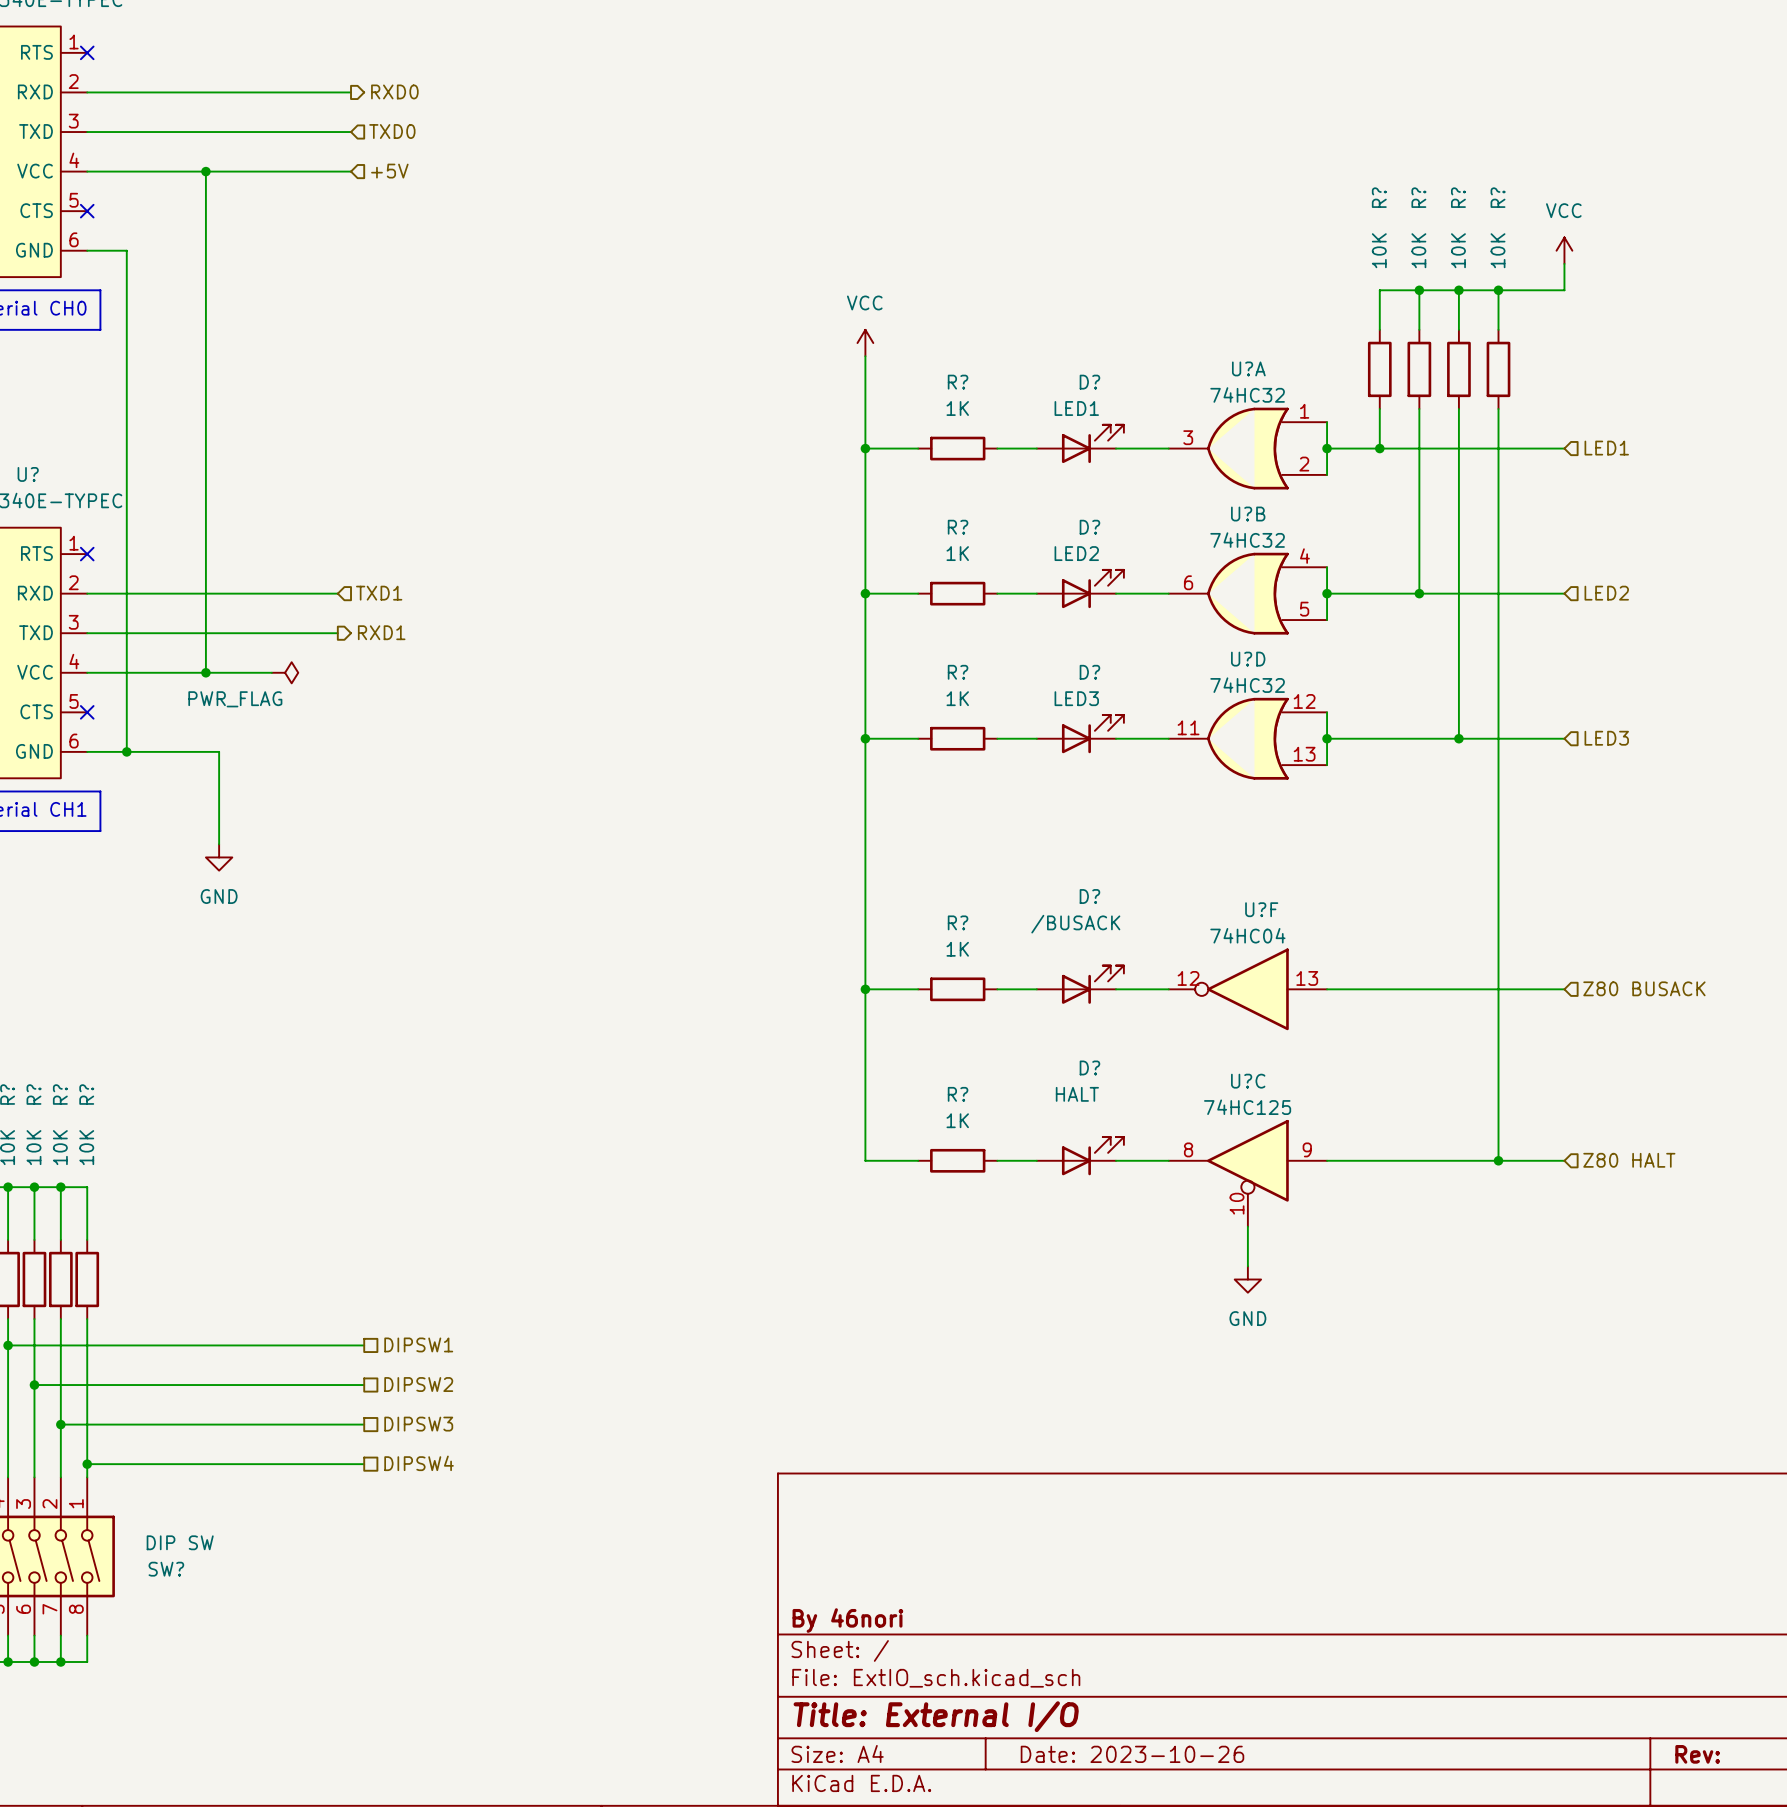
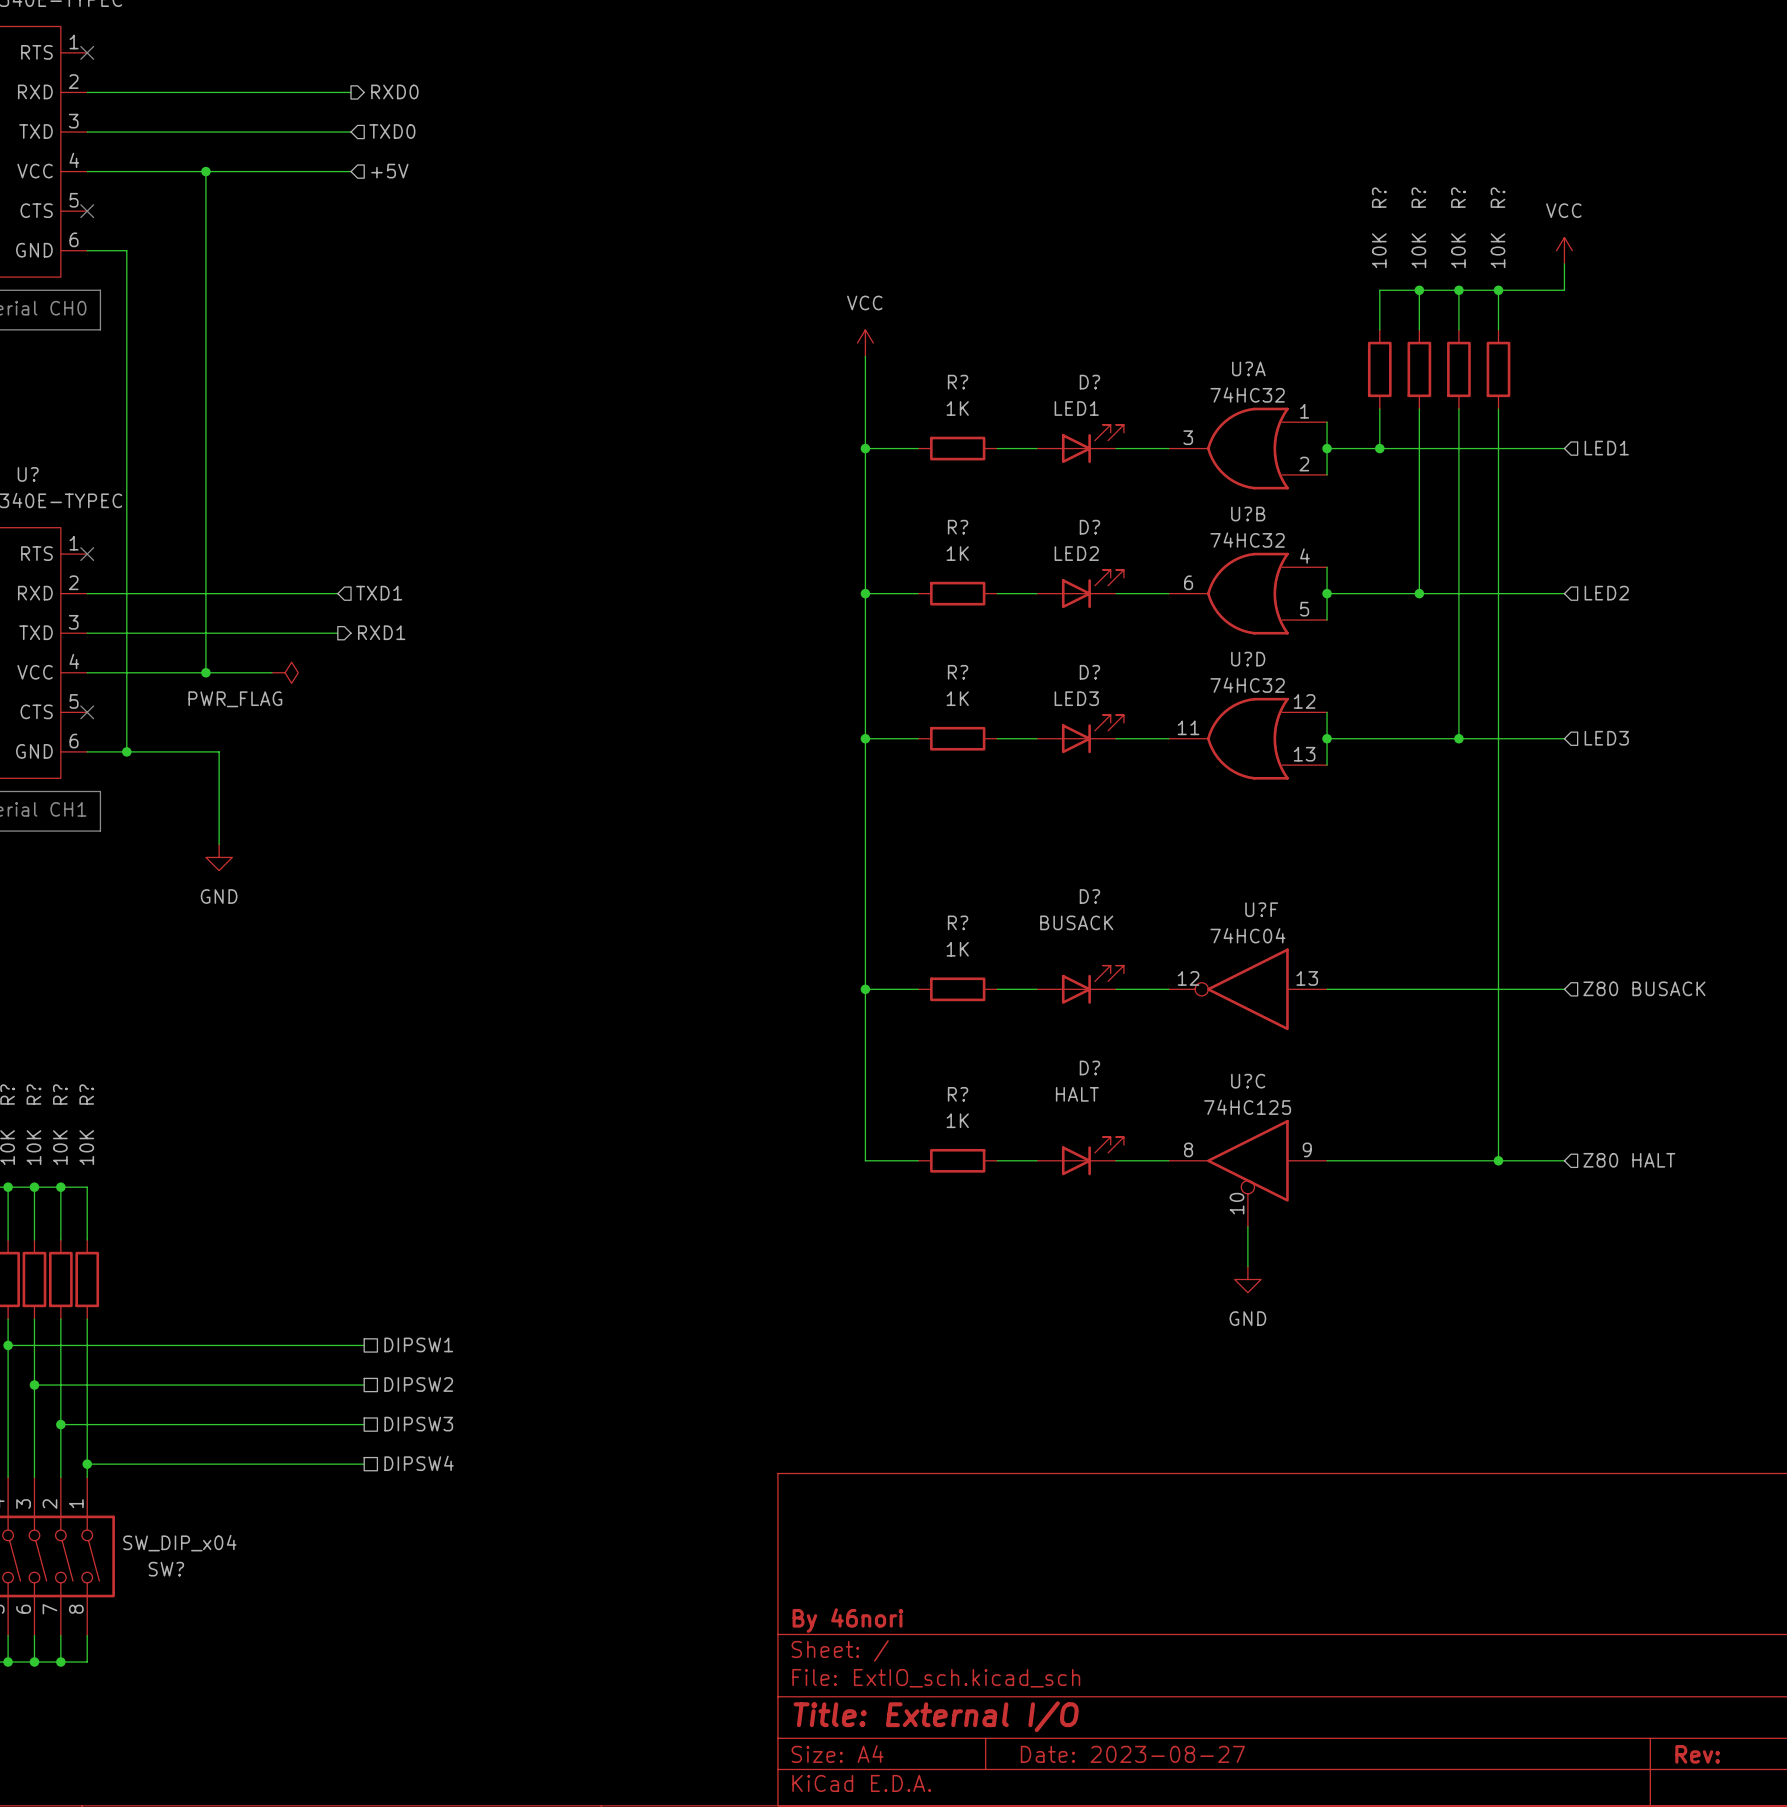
D? value: /BUSACK (1075, 924) -> BUSACK (1076, 922)
SW? value: DIP SW (180, 1542) -> SW_DIP_x04 (179, 1543)
title block: Date: 2023-10-26 (1132, 1754) -> Date: 2023-08-27 (1132, 1754)

